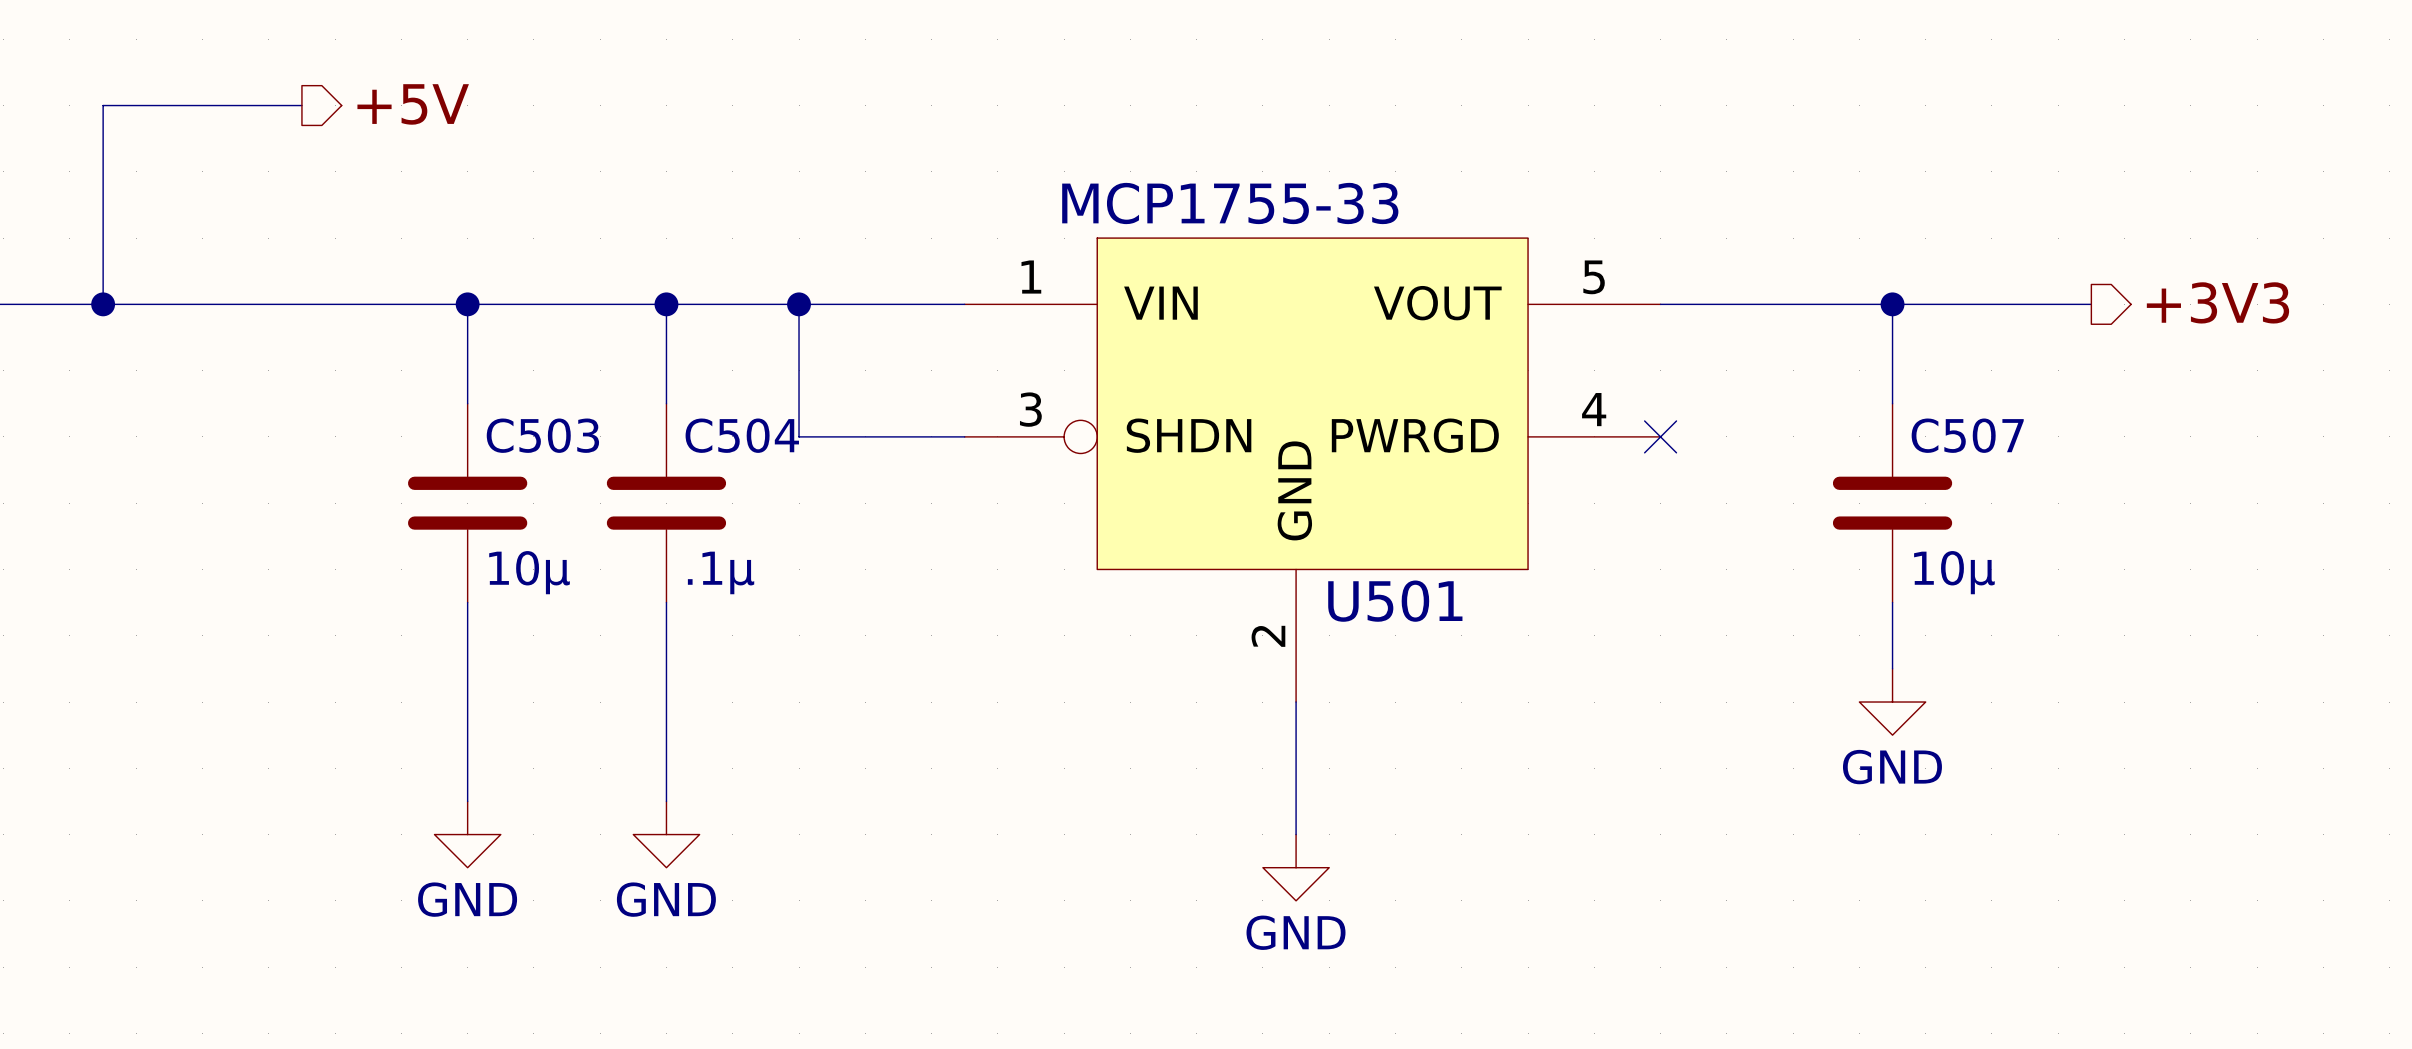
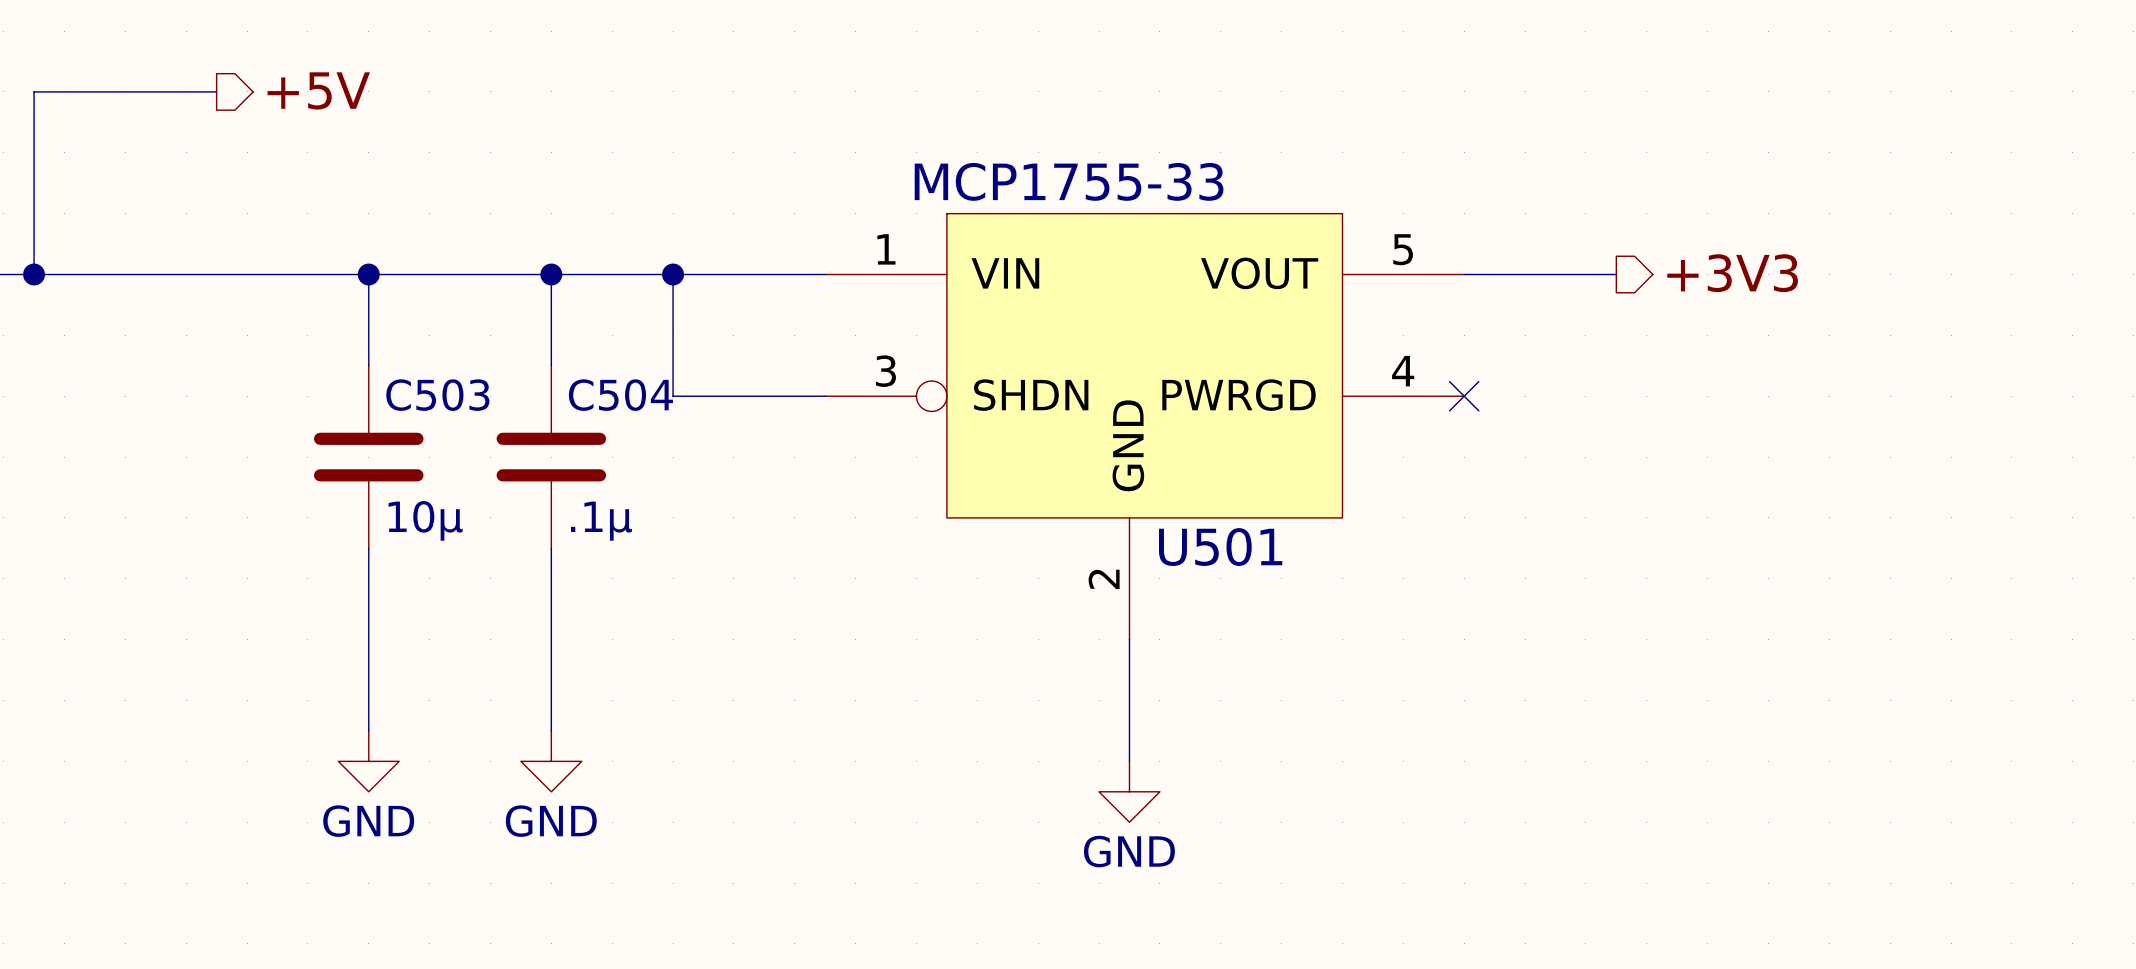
hierarchical label position: +3V3 (2217, 302) -> +3V3 (1732, 273)
wire: (1826, 304) (2091, 304) -> none
wire: (1892, 304) (1892, 403) -> none
junction: (1892, 304) -> none
C507: 10μ (1892, 503) -> none
wire: (1892, 602) (1892, 668) -> none
power symbol: GND (1892, 702) -> none

